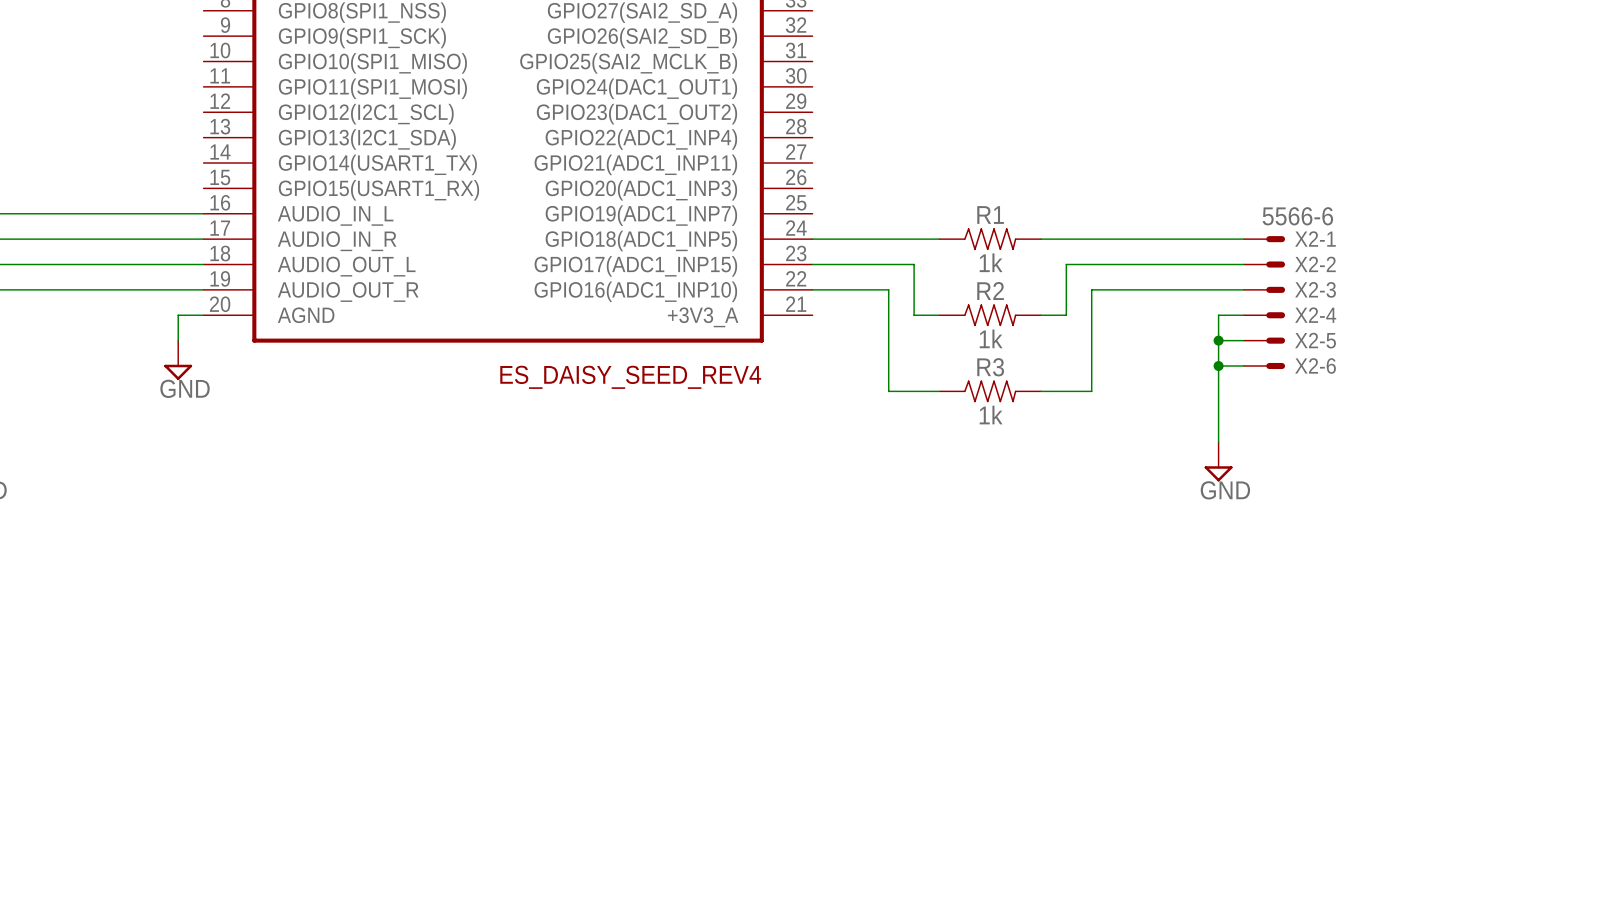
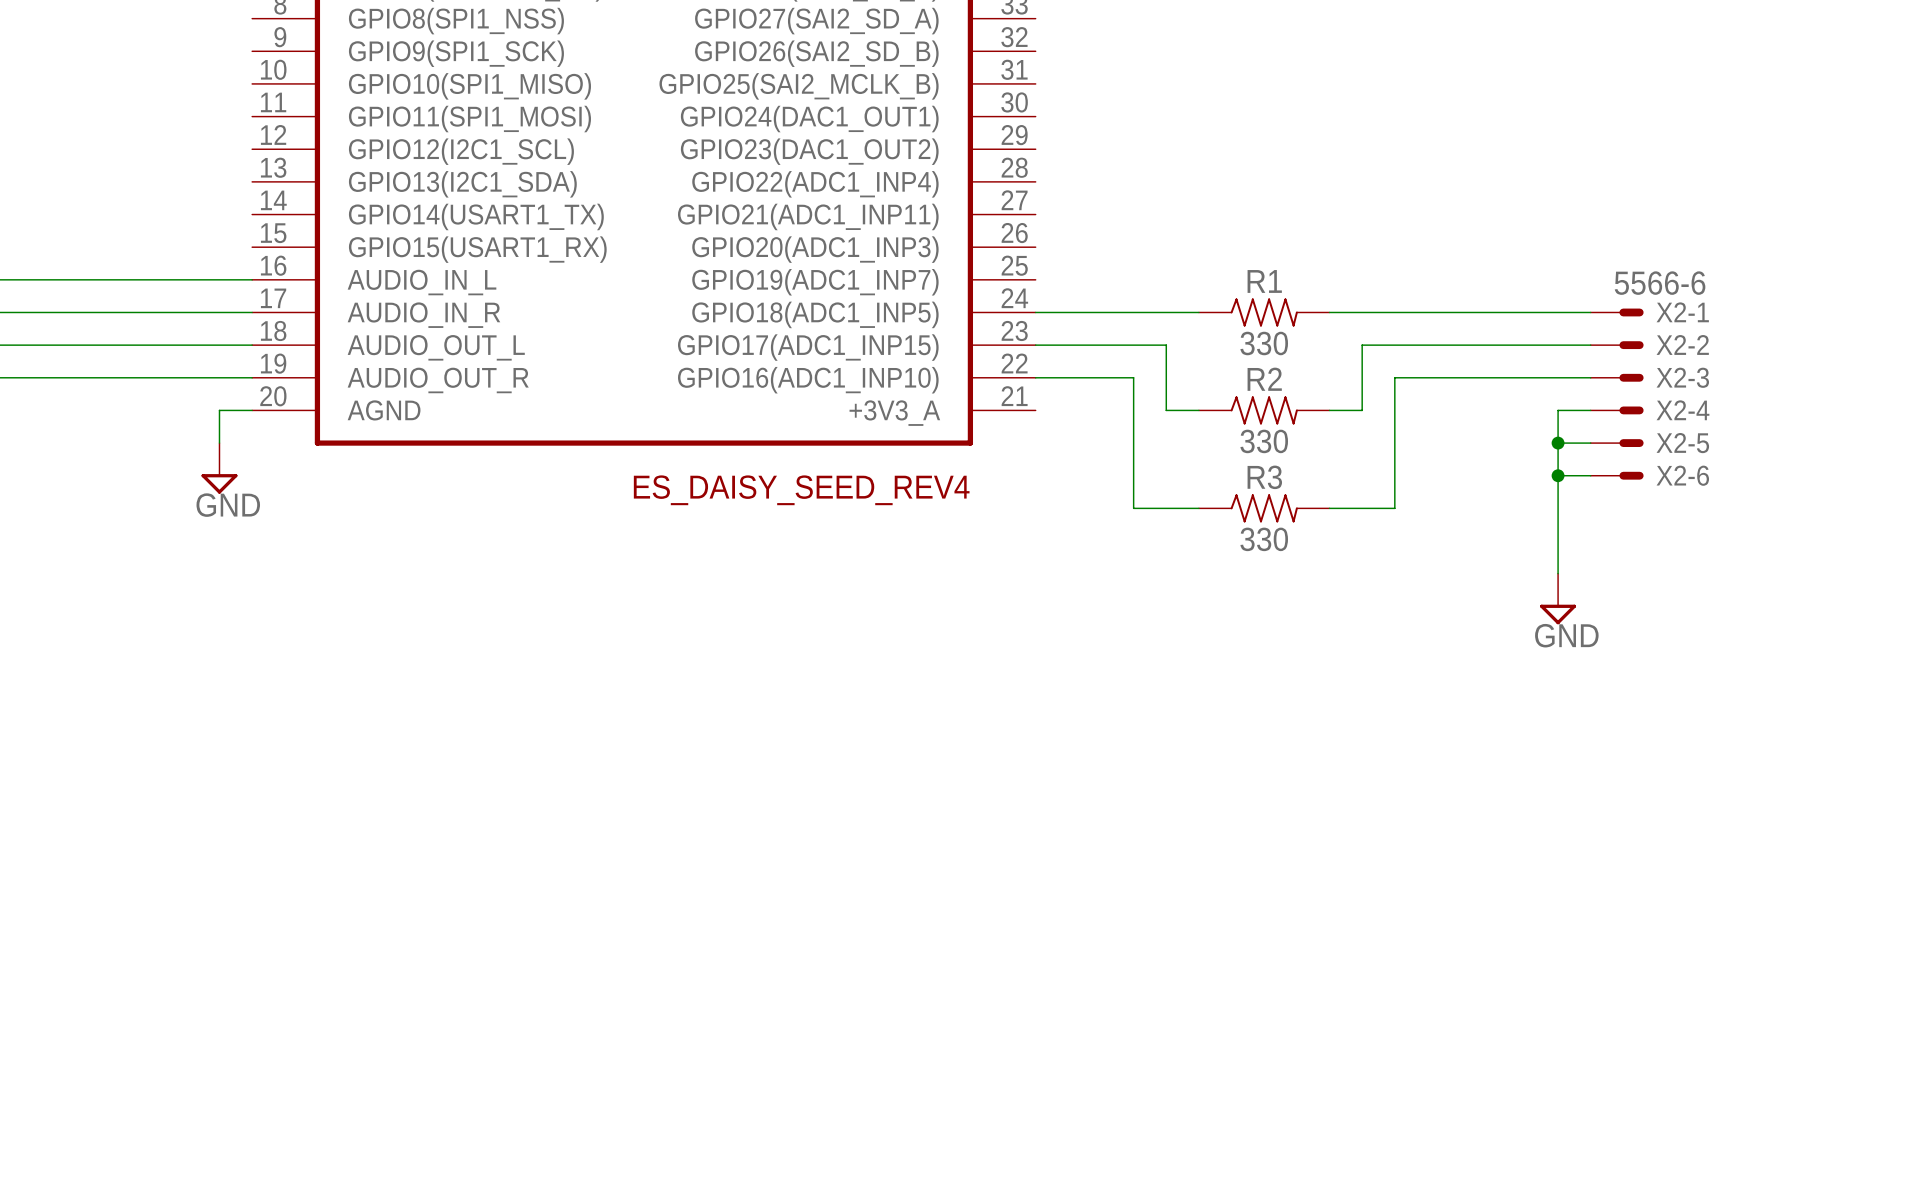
R1 value: 1k (991, 262) -> 330 (1264, 343)
R2 value: 1k (991, 338) -> 330 (1264, 441)
R3 value: 1k (991, 415) -> 330 (1264, 539)

